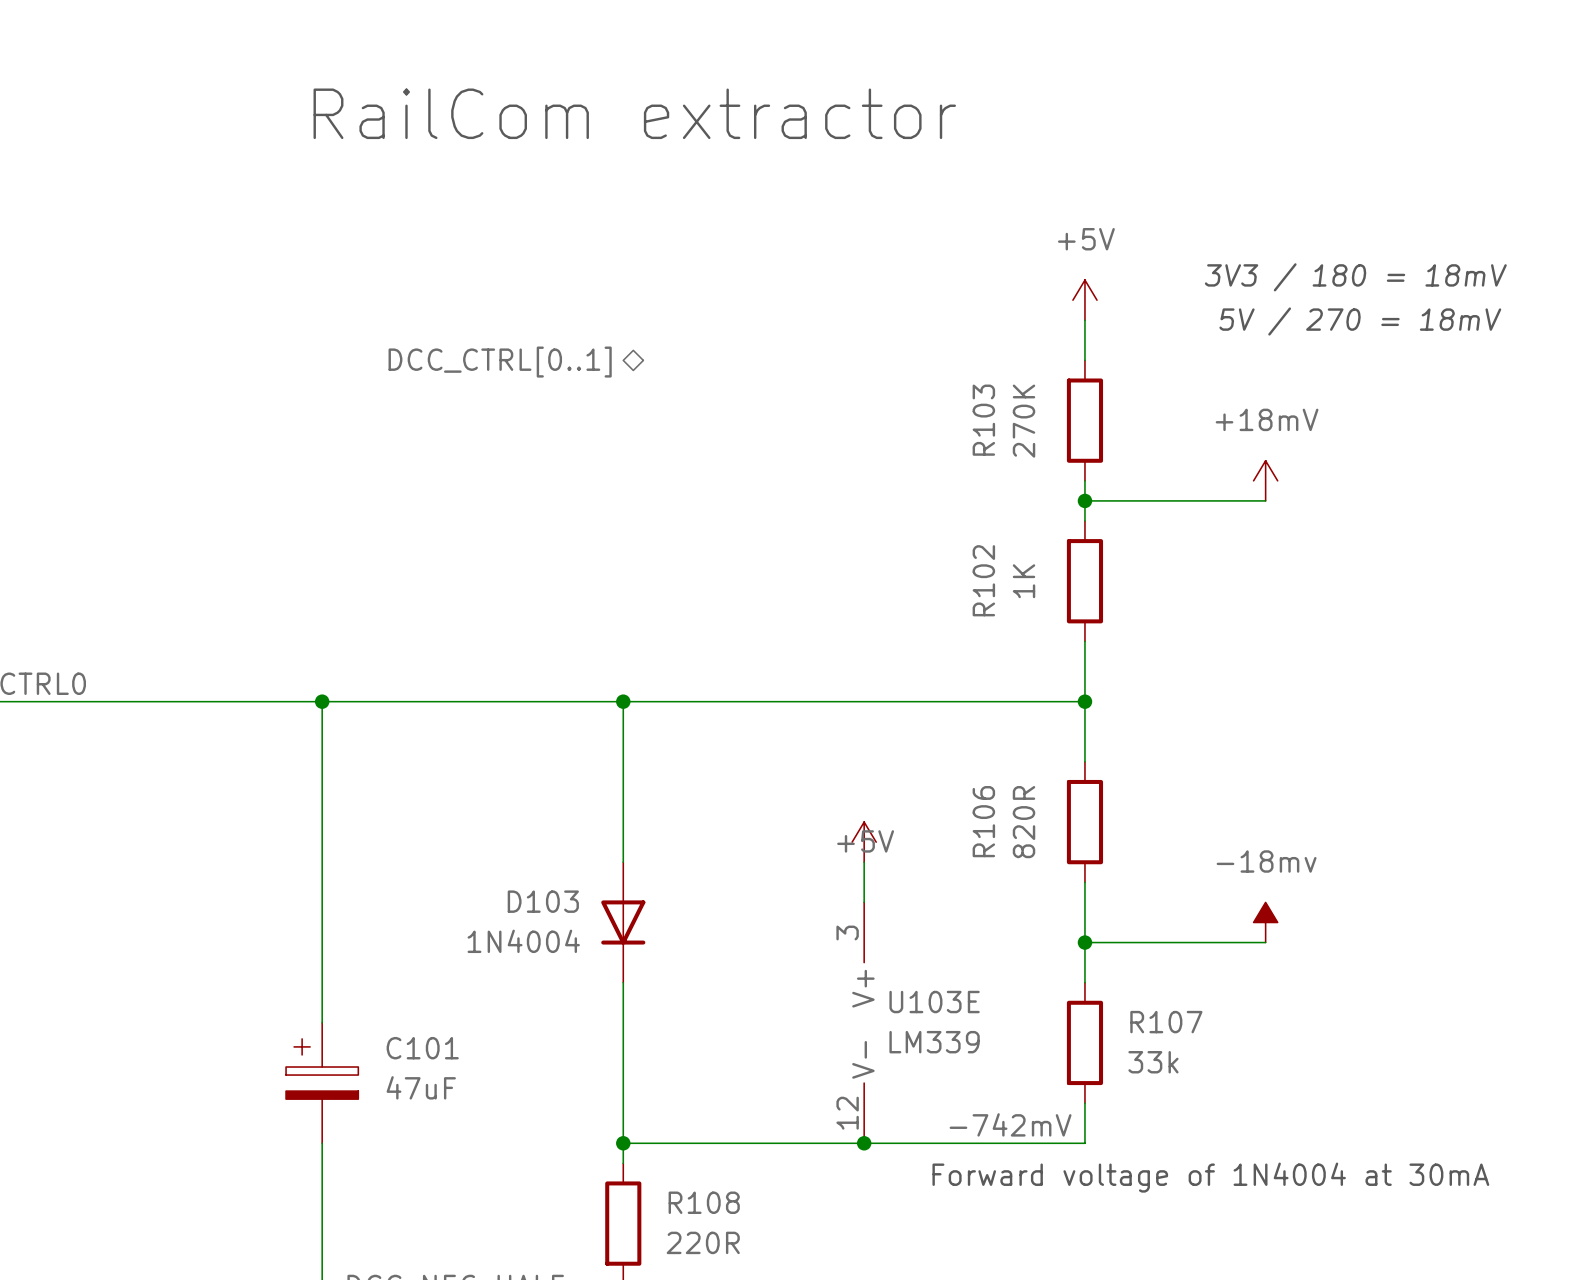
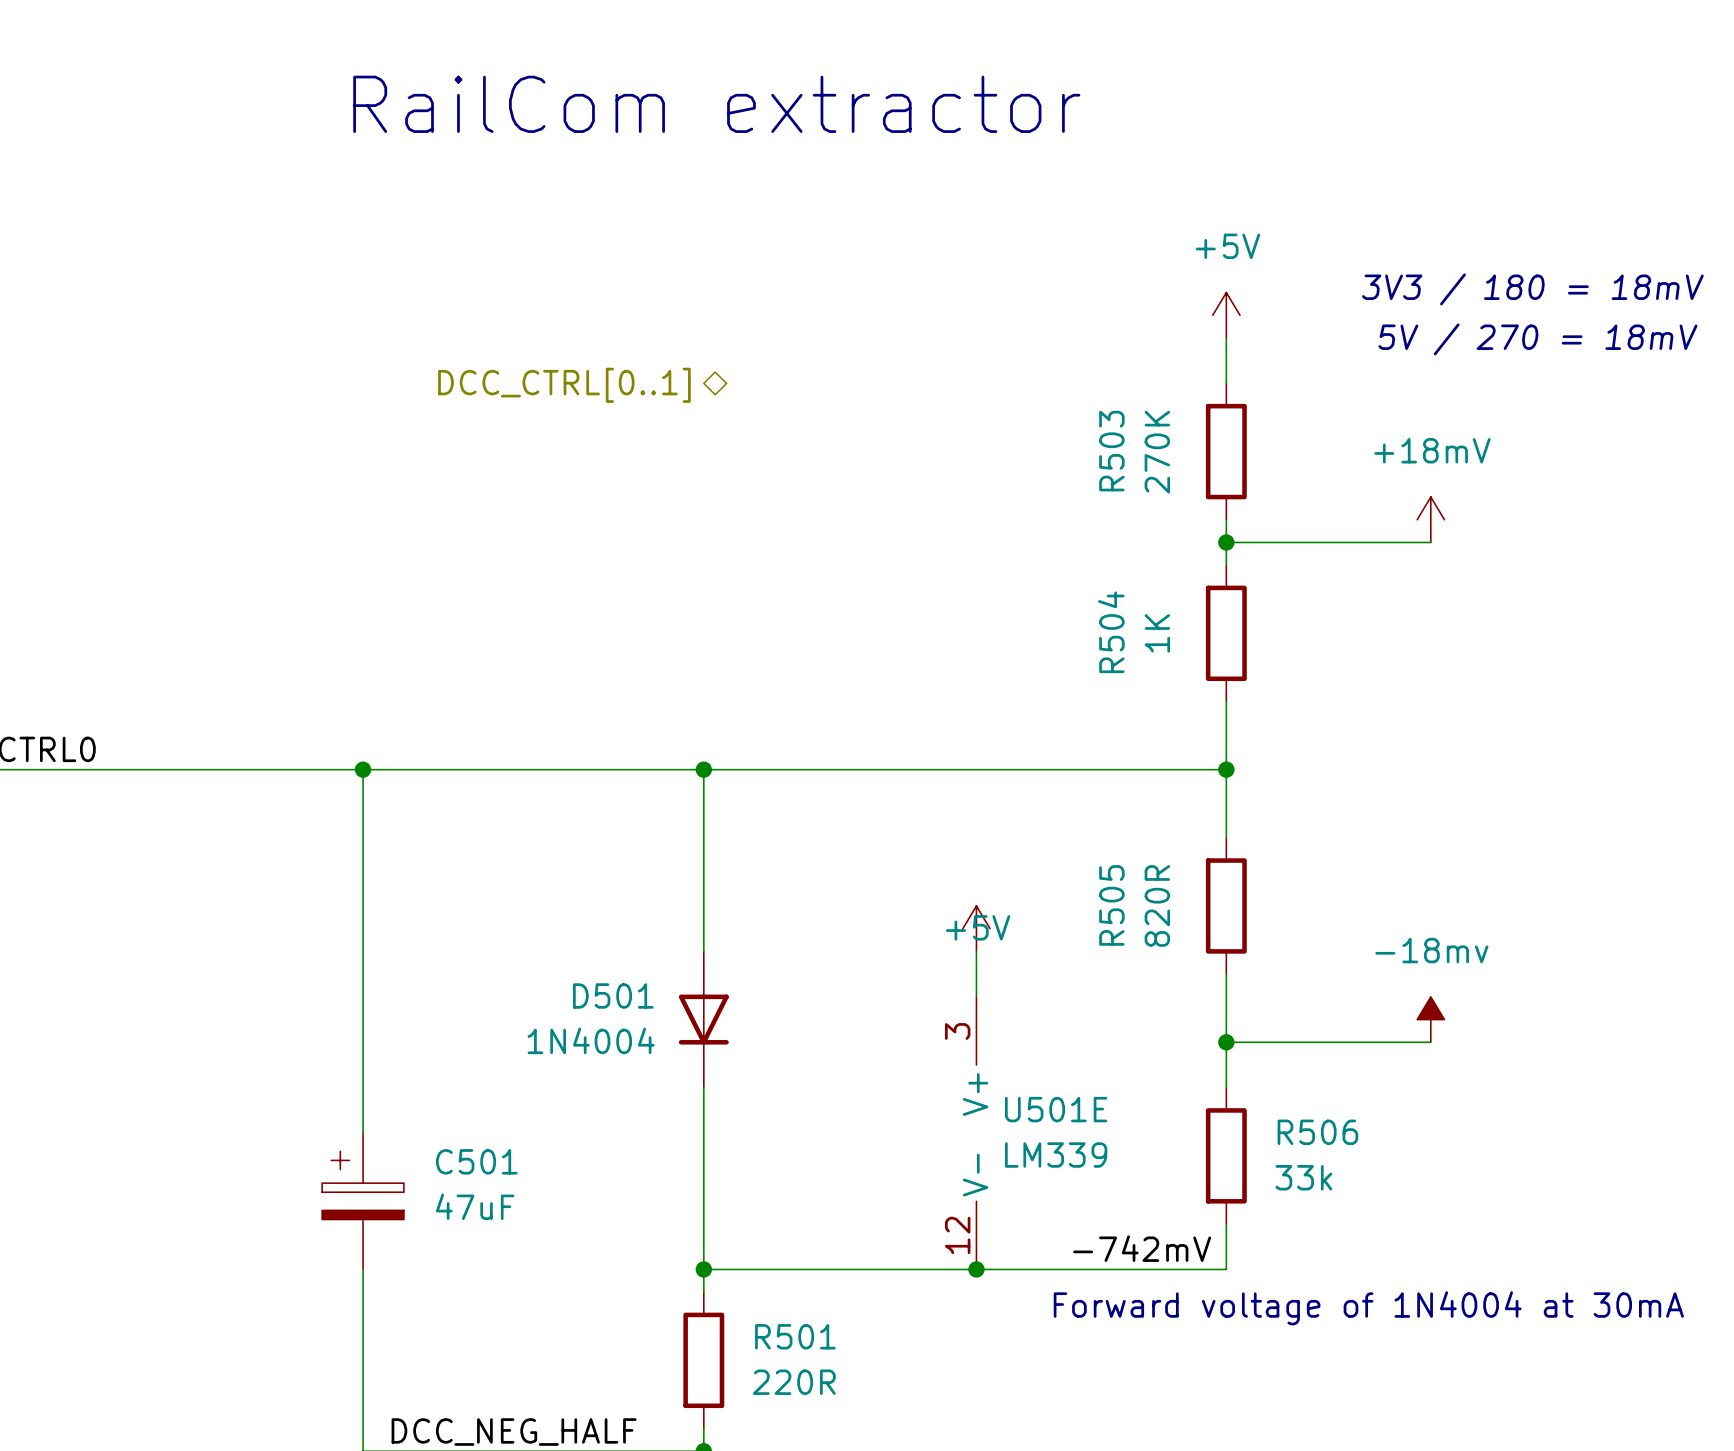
R103 name: R103 (983, 420) -> R503 (1111, 451)
R102 name: R102 (983, 580) -> R504 (1111, 632)
R106 name: R106 (983, 821) -> R505 (1111, 905)
D103 name: D103 (543, 901) -> D501 (613, 996)
U103E name: U103E (934, 1002) -> U501E (1056, 1109)
R107 name: R107 (1166, 1022) -> R506 (1317, 1132)
C101 name: C101 (422, 1048) -> C501 (476, 1161)
R108 name: R108 (704, 1202) -> R501 (795, 1336)

